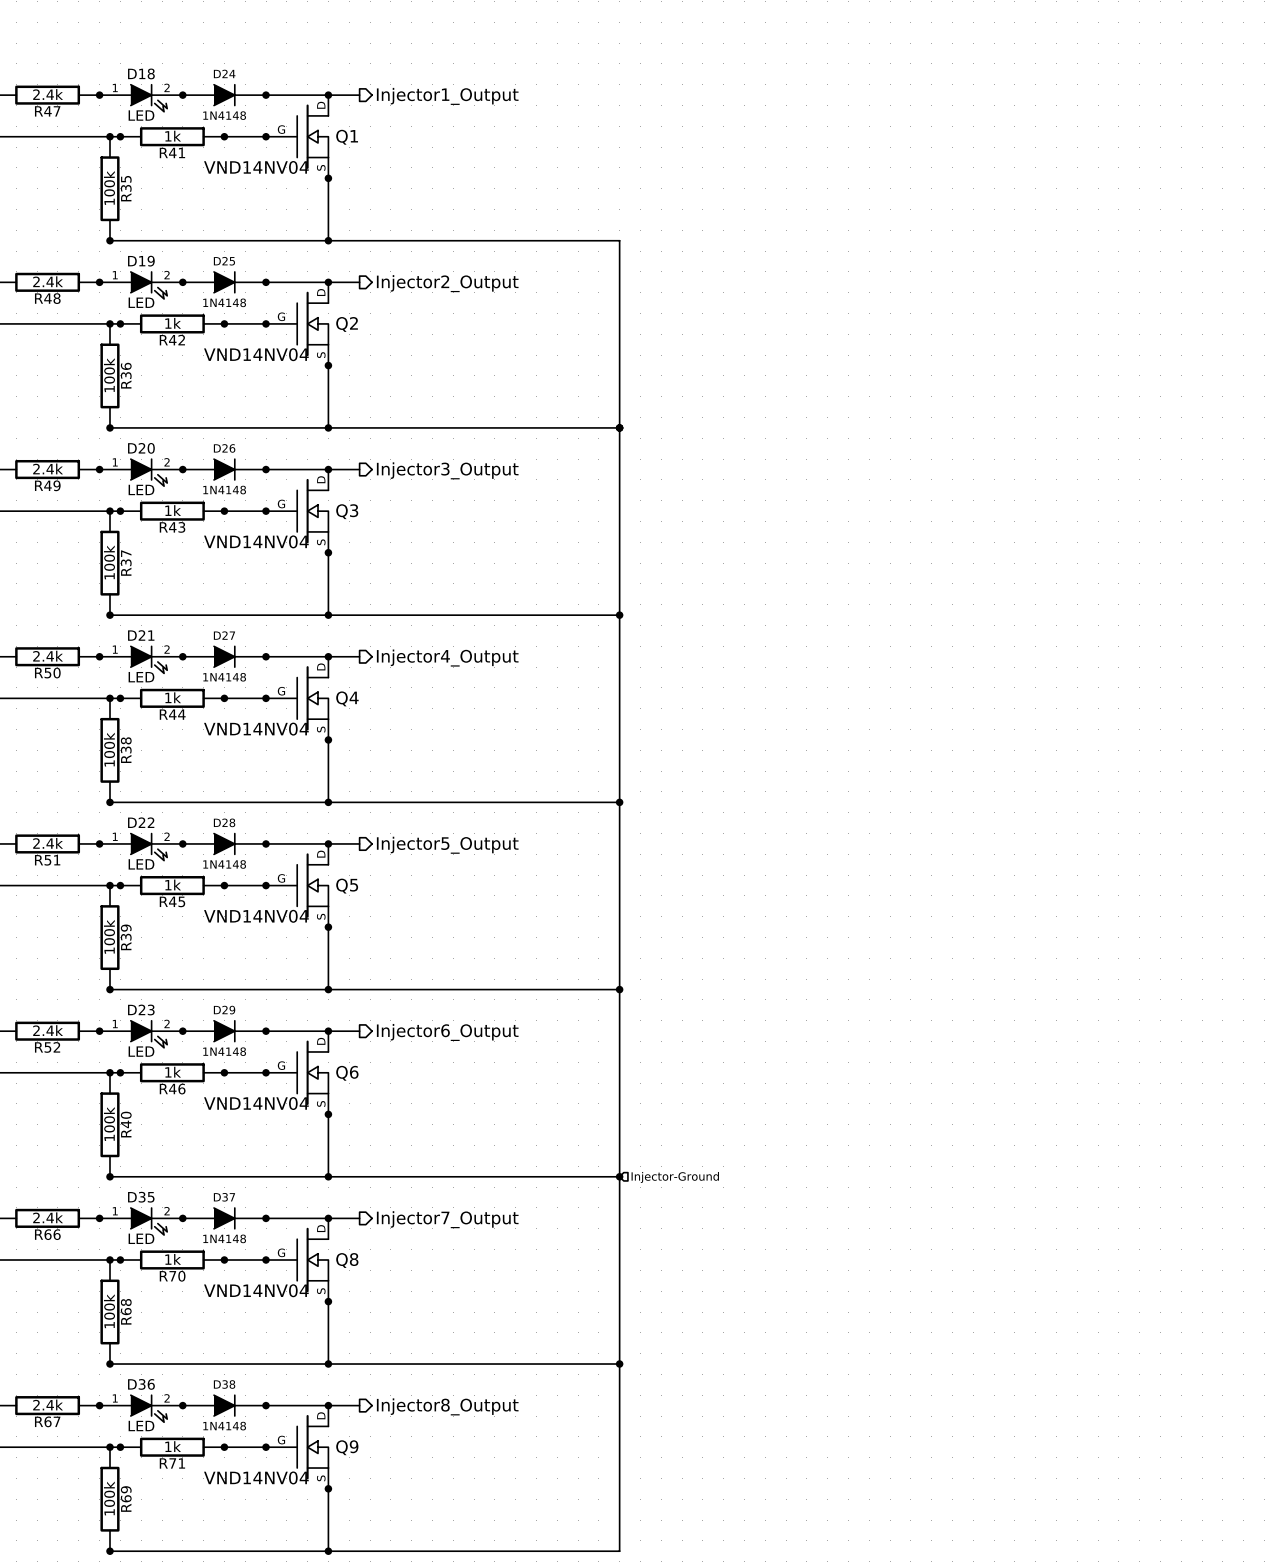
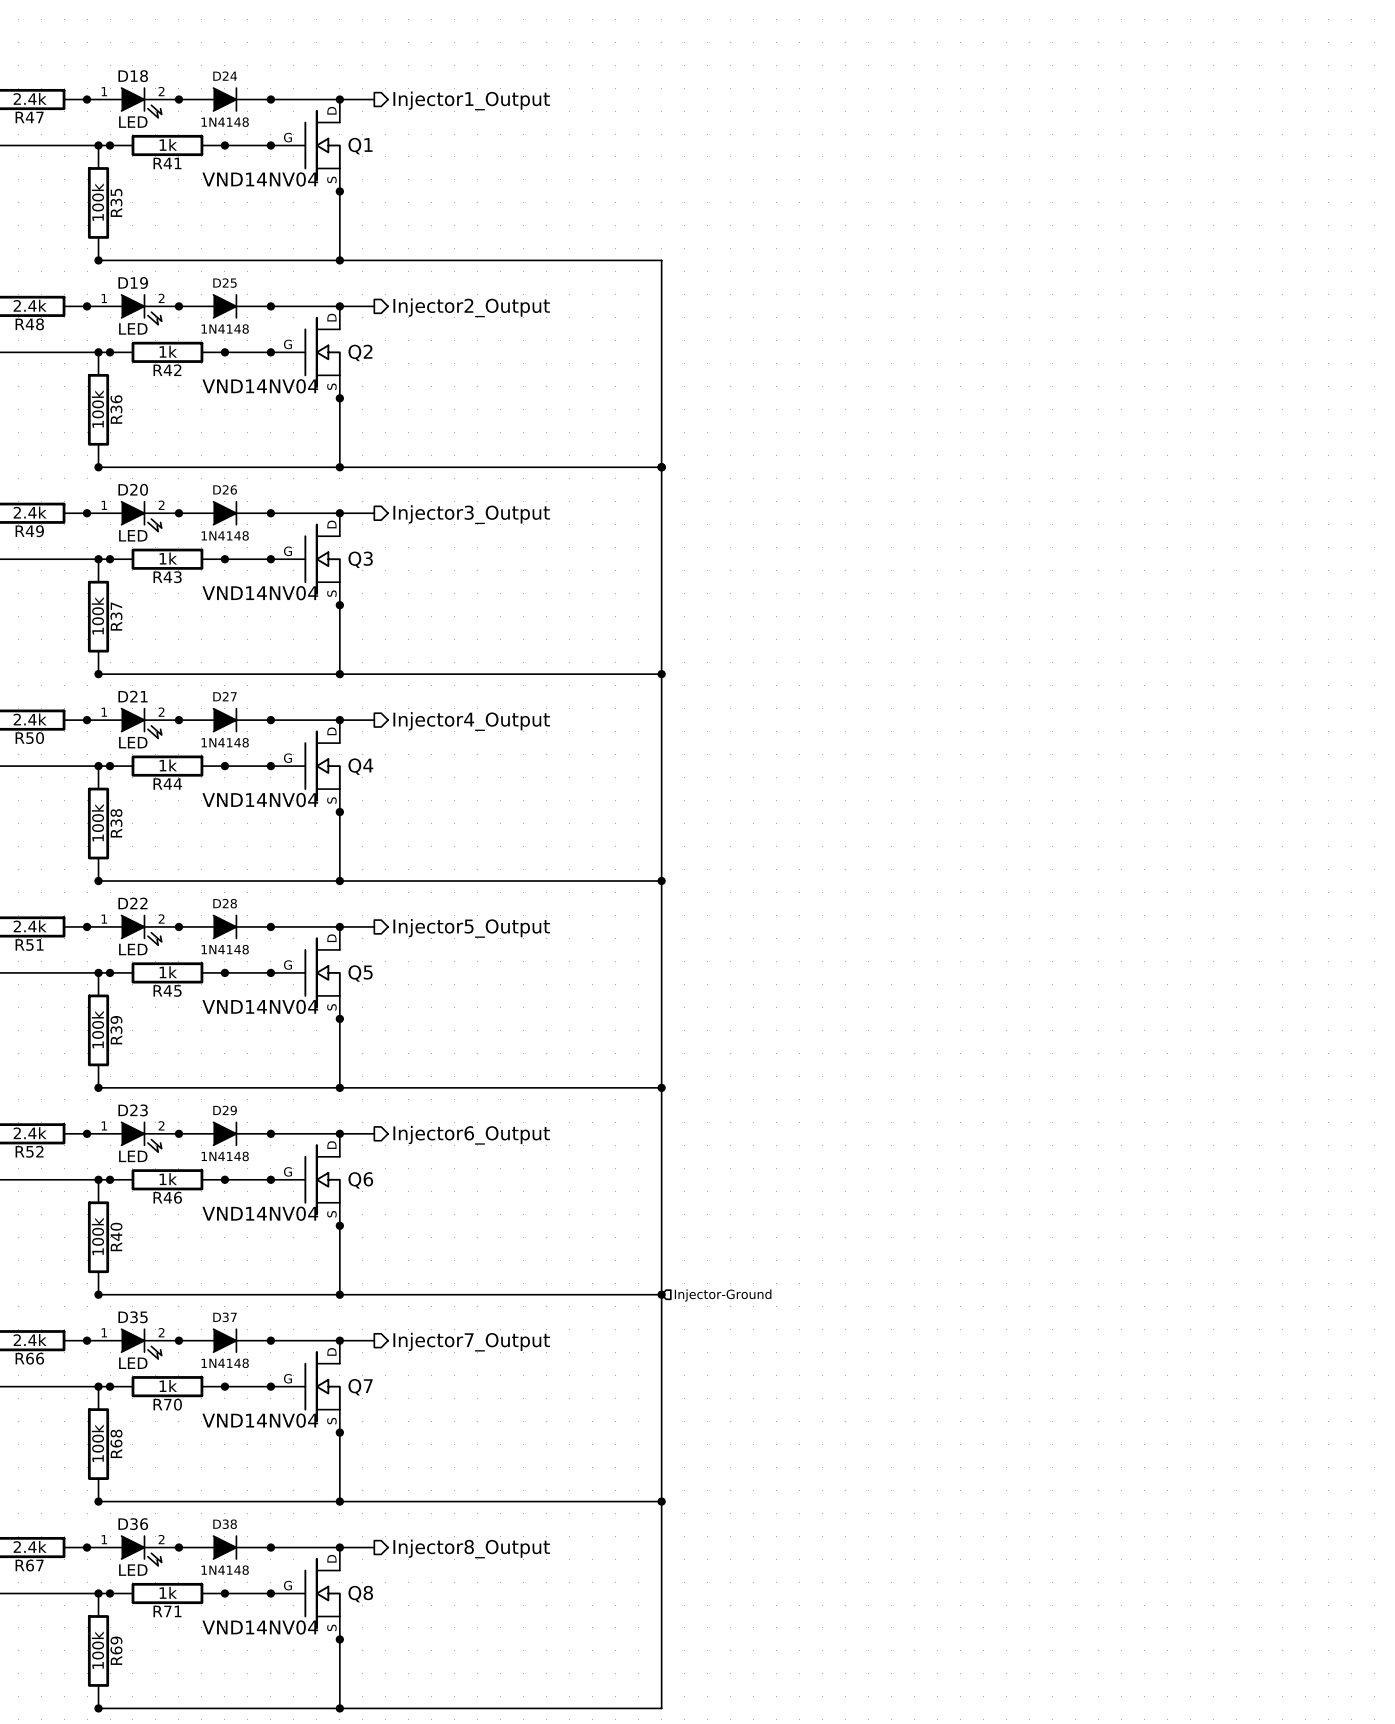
Q8 name: Q8 (347, 1260) -> Q7 (360, 1387)
Q9 name: Q9 (347, 1447) -> Q8 (360, 1594)

